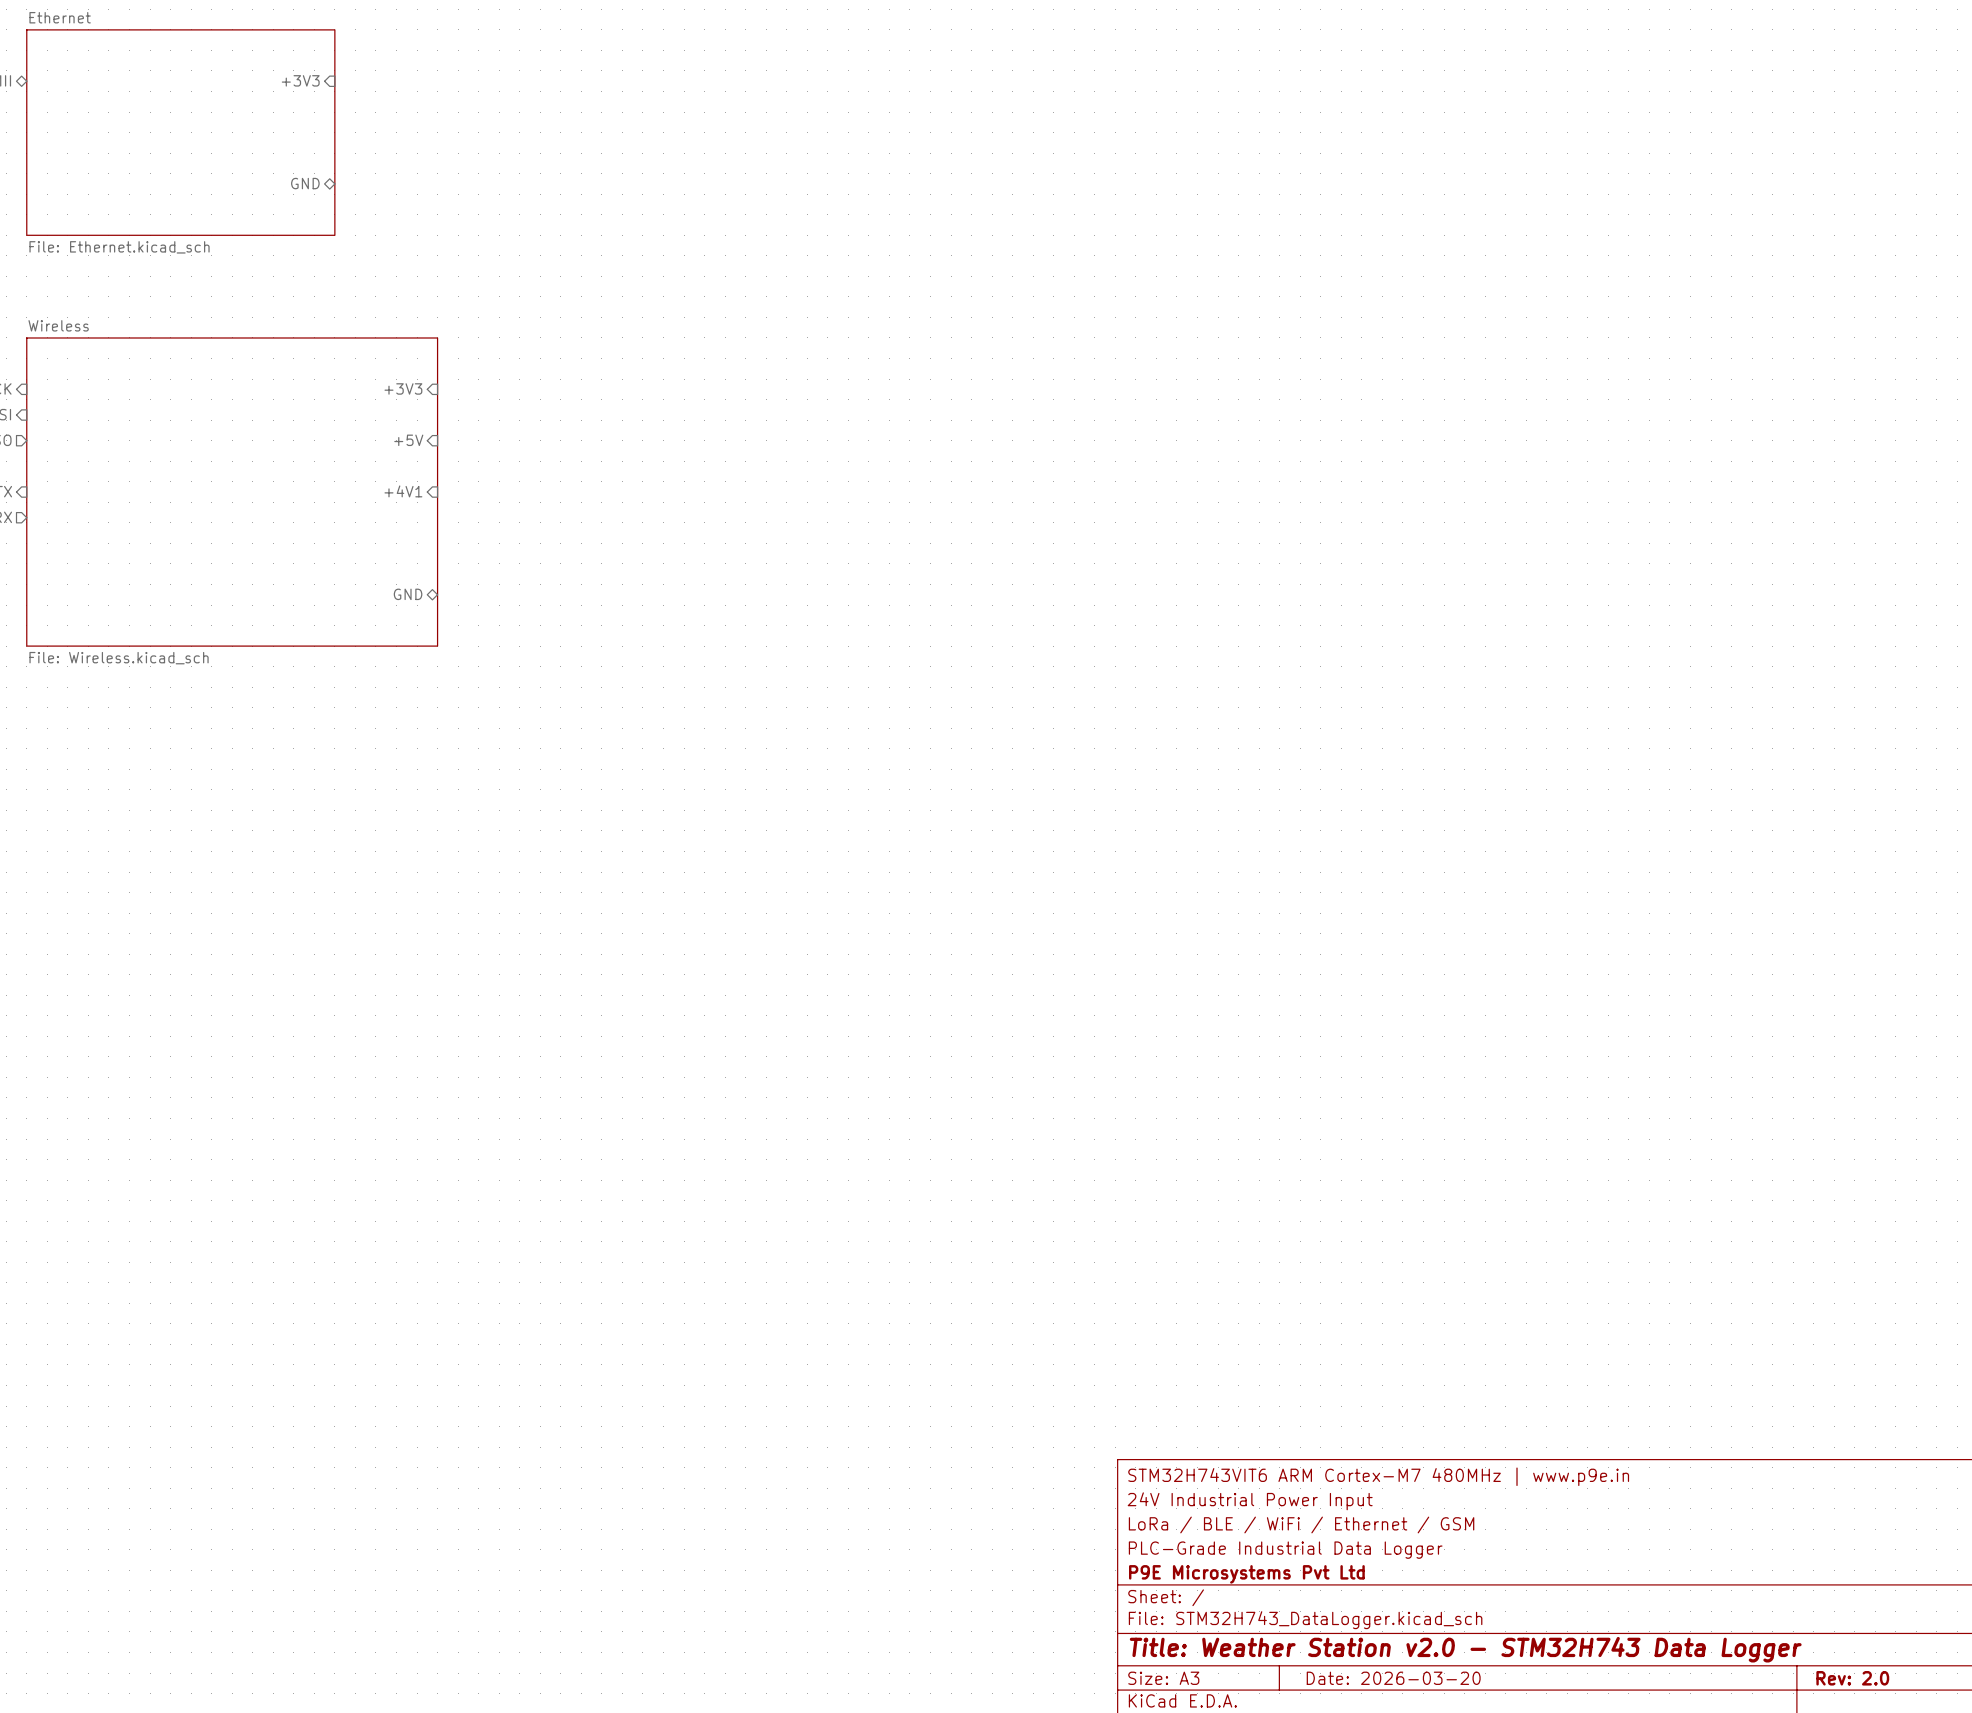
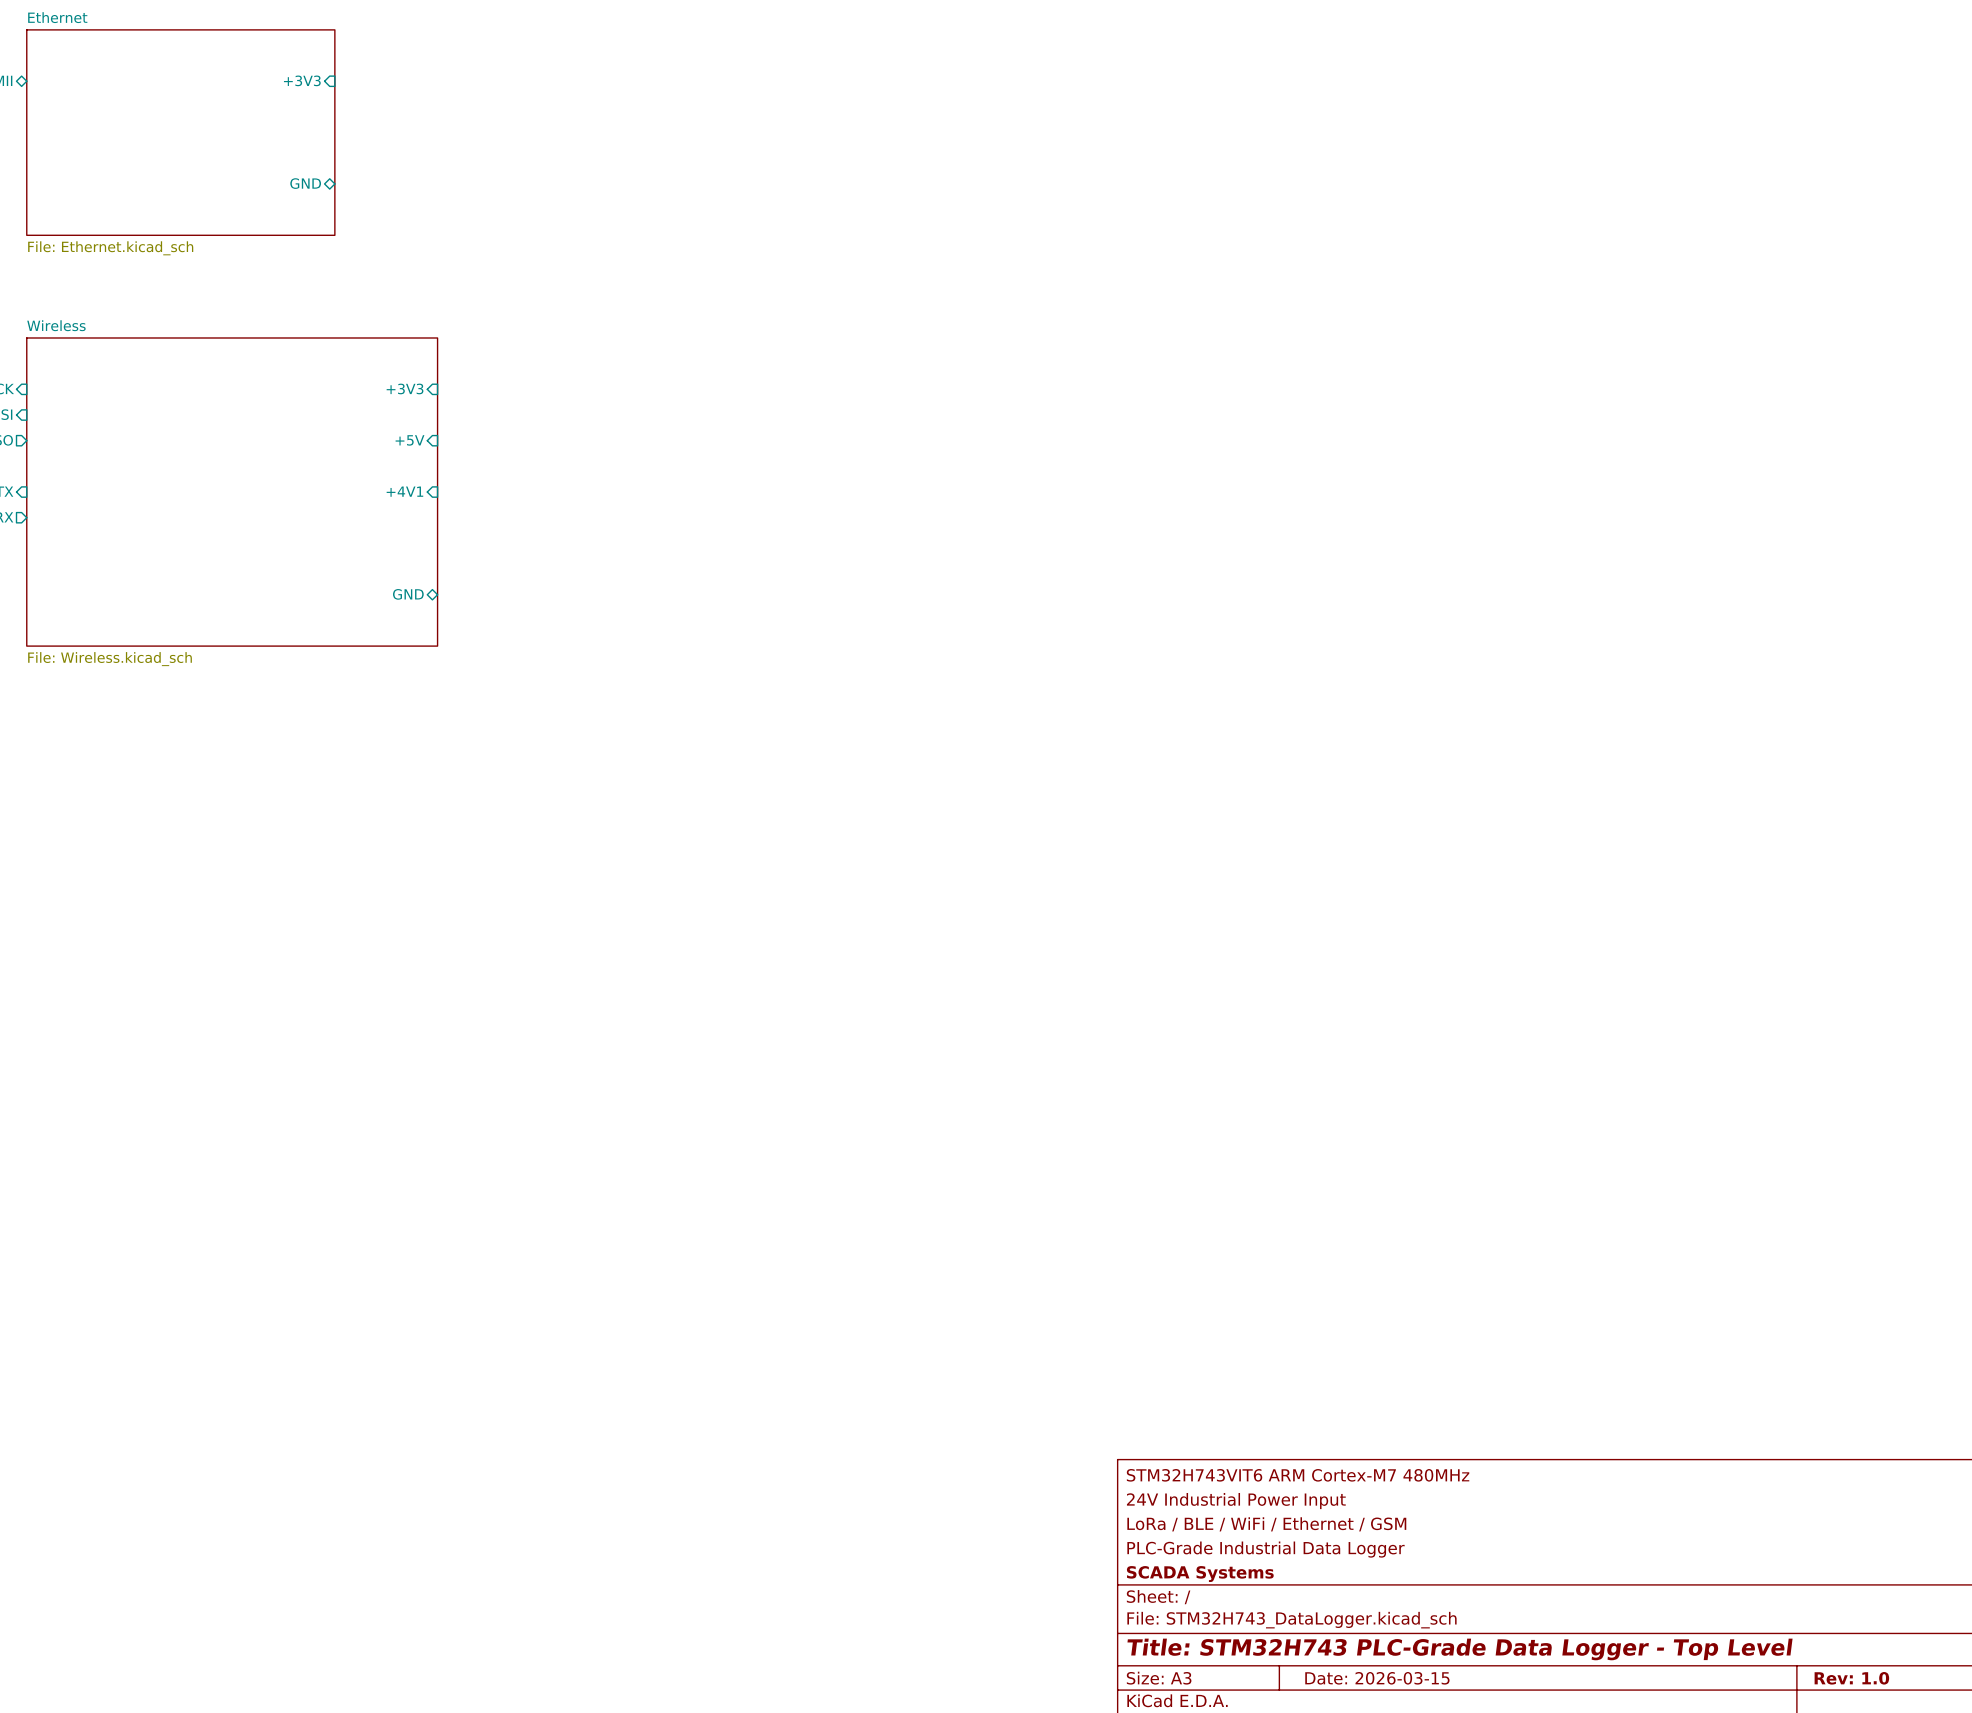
title block: STM32H743VIT6 ARM Cortex-M7 480MHz | www.p9e.in (1378, 1476) -> STM32H743VIT6 ARM Cortex-M7 480MHz (1298, 1475)
title block: P9E Microsystems Pvt Ltd (1246, 1574) -> SCADA Systems (1200, 1574)
title block: Title: Weather Station v2.0 - STM32H743 Data Logger (1465, 1649) -> Title: STM32H743 PLC-Grade Data Logger - Top Level (1460, 1649)
title block: Date: 2026-03-20 (1393, 1678) -> Date: 2026-03-15 (1377, 1678)
title block: Rev: 2.0 (1852, 1678) -> Rev: 1.0 (1851, 1678)

